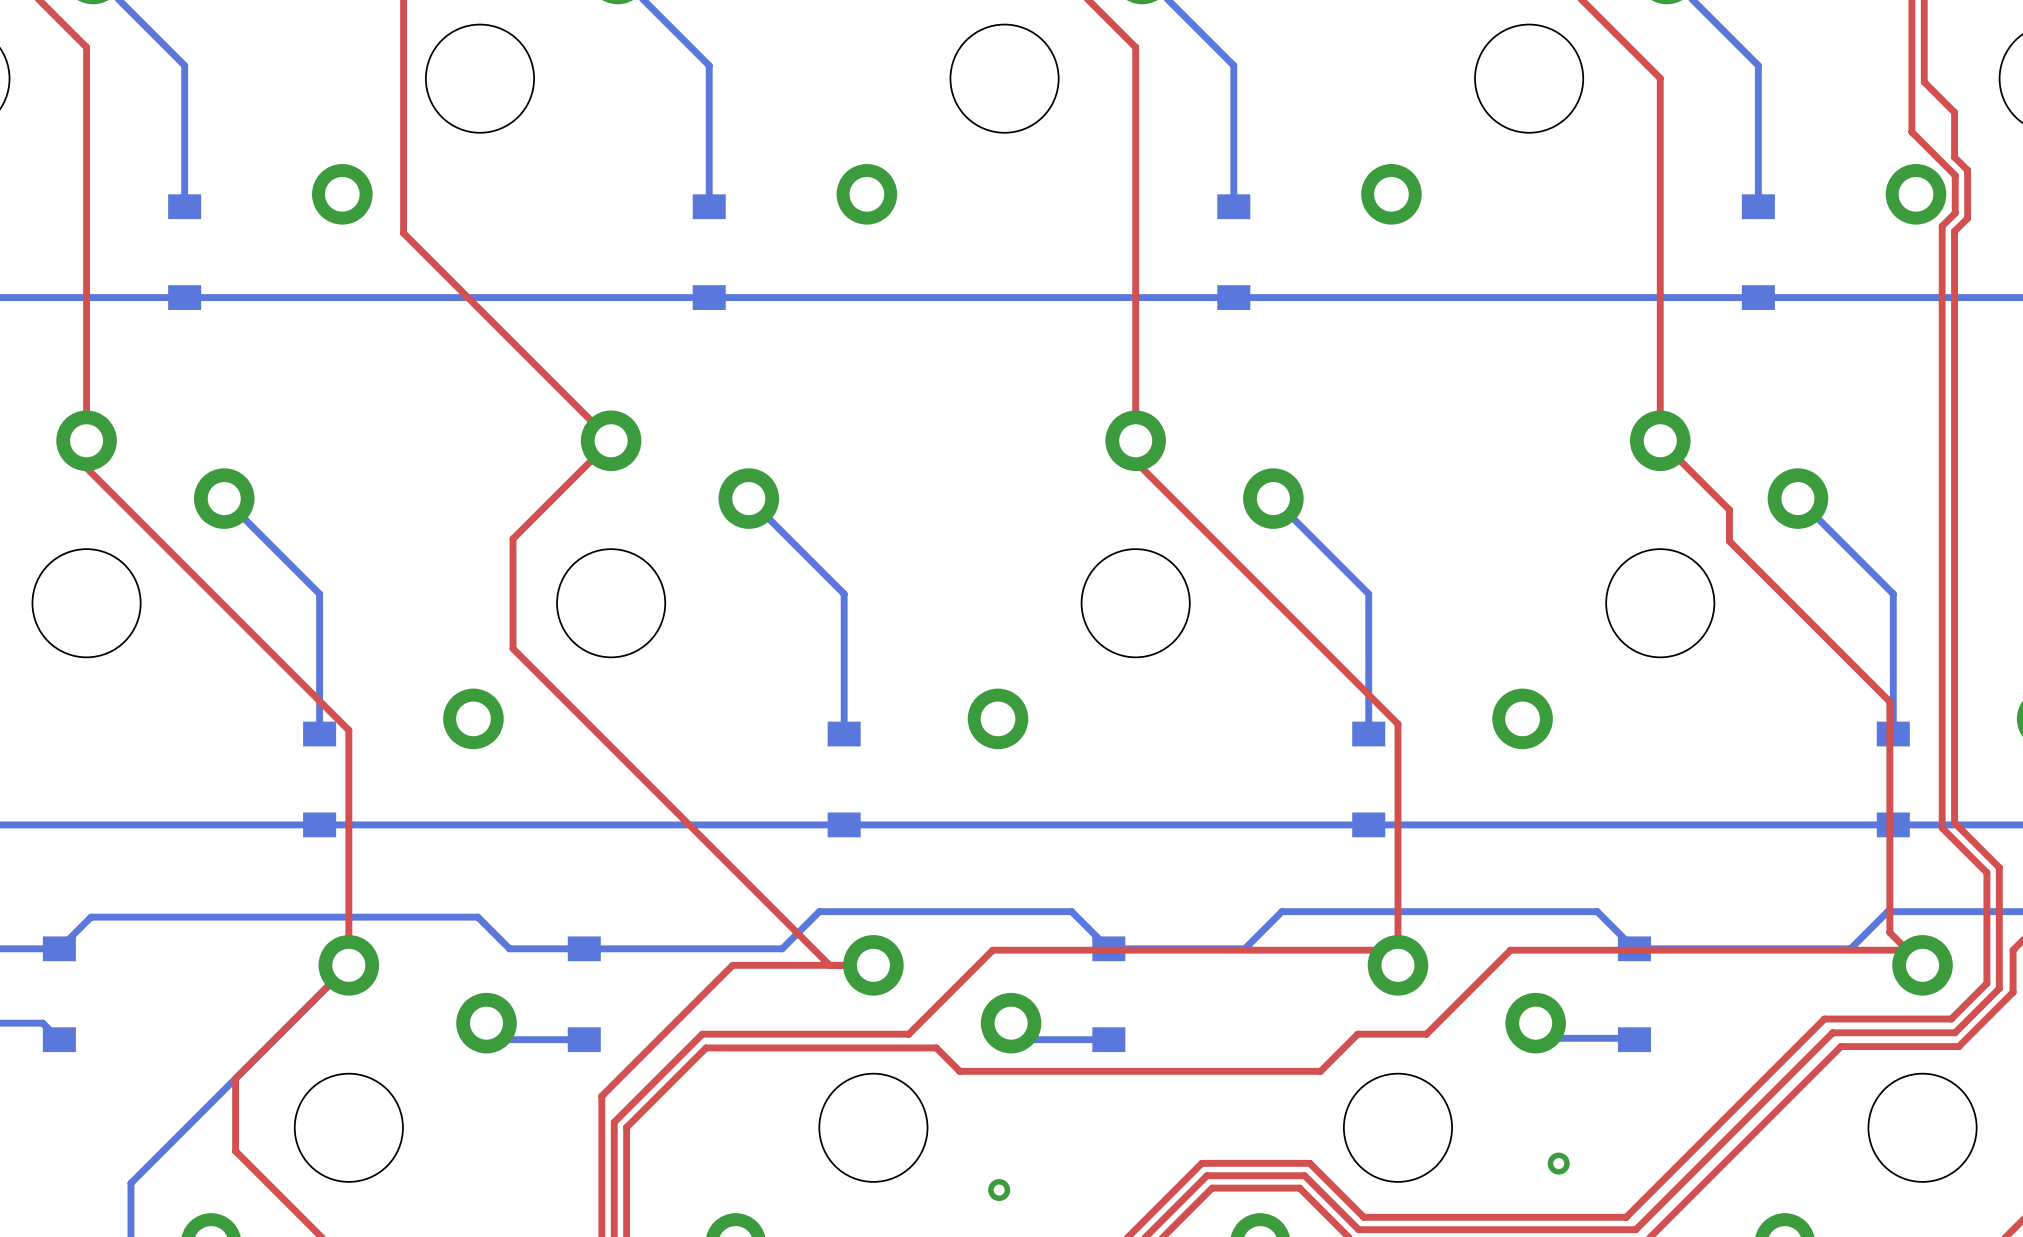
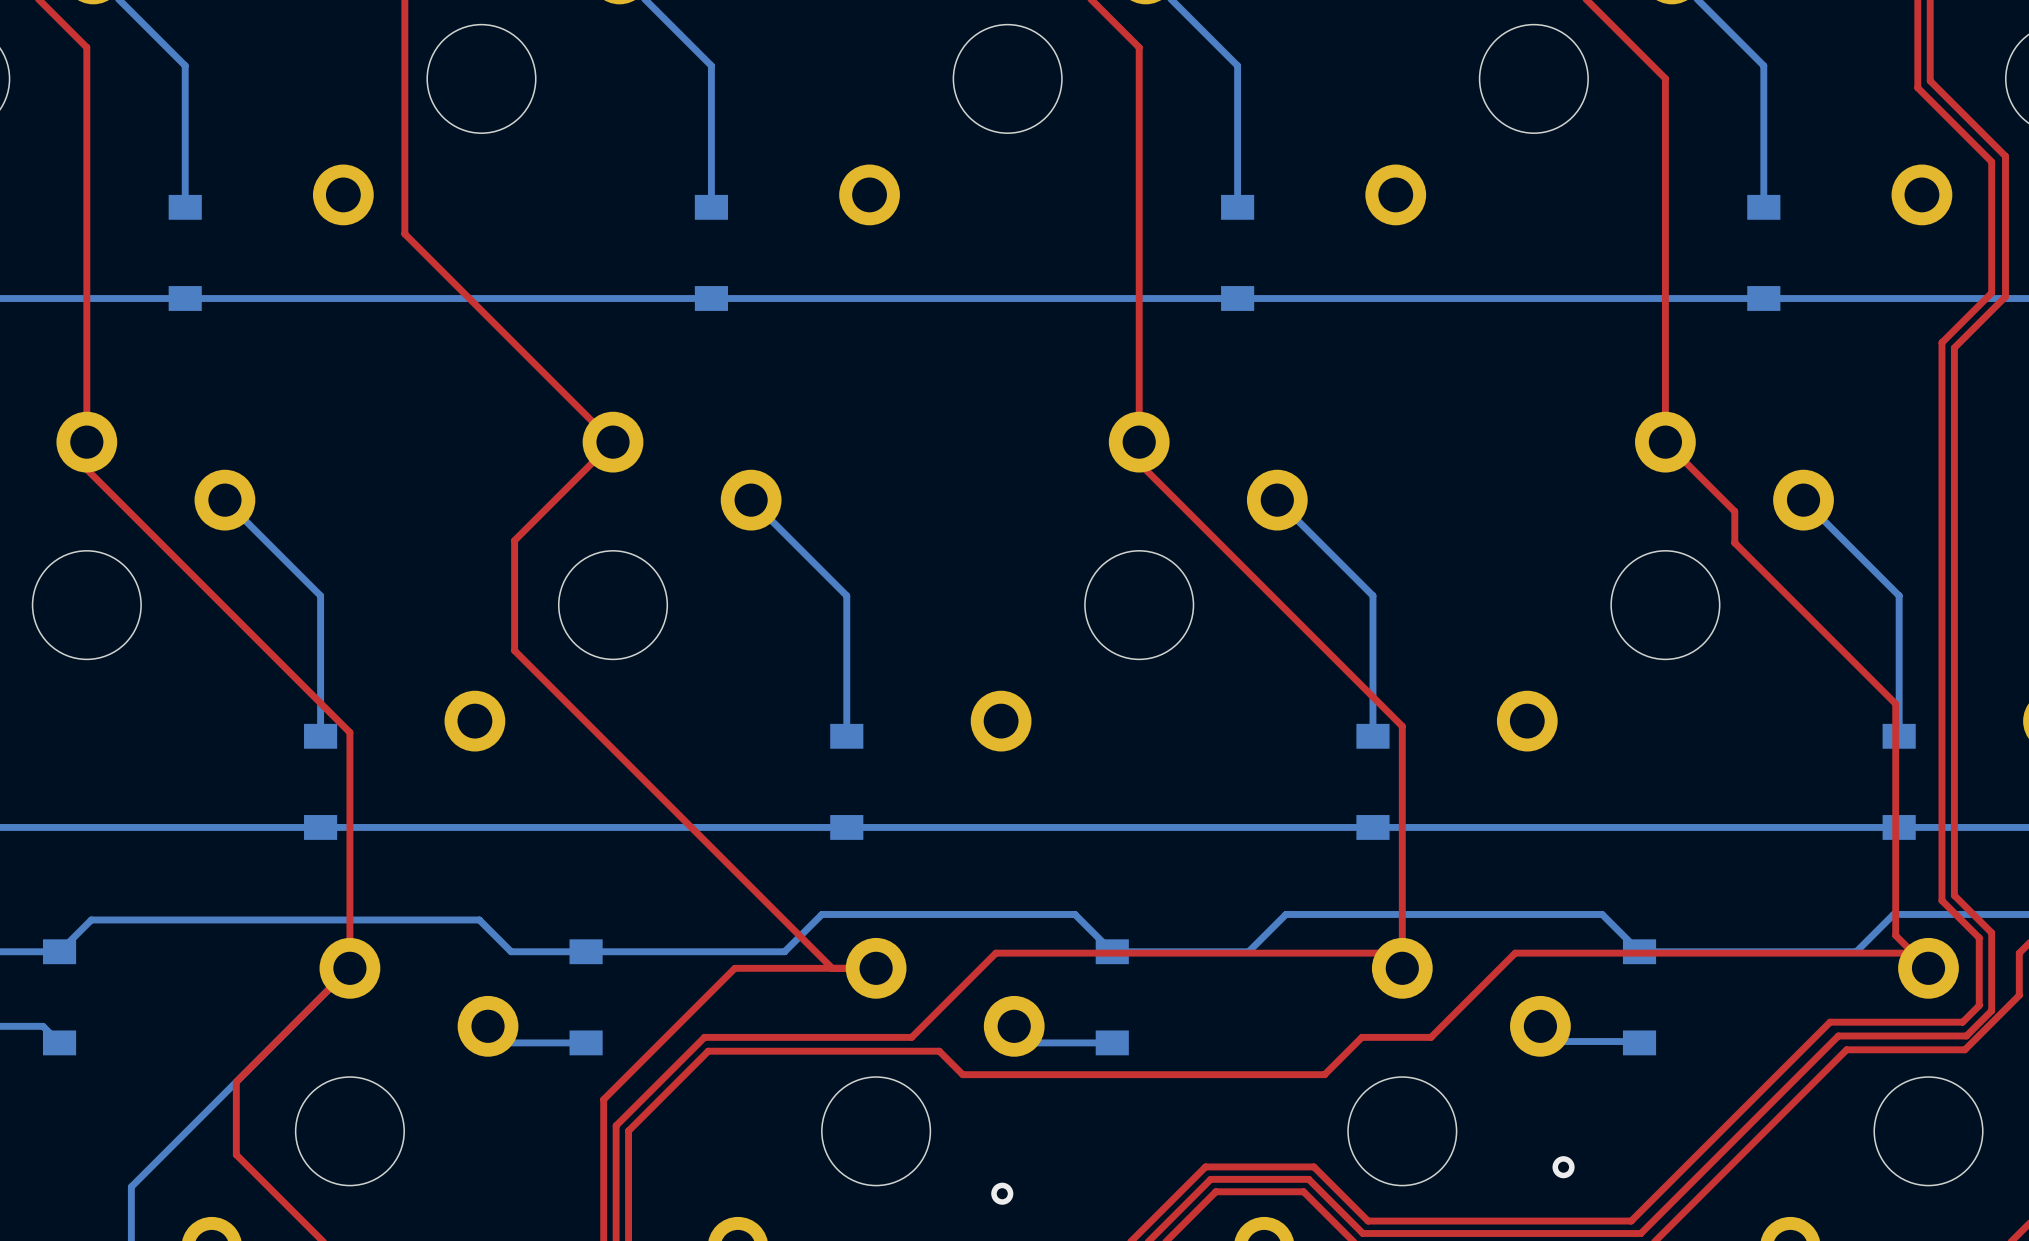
top track: (1924, 80) (1954, 112) (1954, 157) (1967, 170) (1967, 218) (1954, 231) (1954, 822) (1999, 867) (1999, 988) (1955, 1032) -> (1930, 80) (2005, 156) (2005, 296) (1954, 347) (1954, 895) (1991, 932) (1991, 1010) (1966, 1036) (1961, 1036)
top track: (1911, 87) (1911, 132) (1955, 175) (1955, 213) (1942, 226) (1942, 827) (1986, 872) (1986, 983) (1951, 1019) -> (1917, 87) (1991, 161) (1991, 292) (1941, 342) (1941, 900) (1979, 937) (1979, 1005) (1962, 1022) (1957, 1022)

